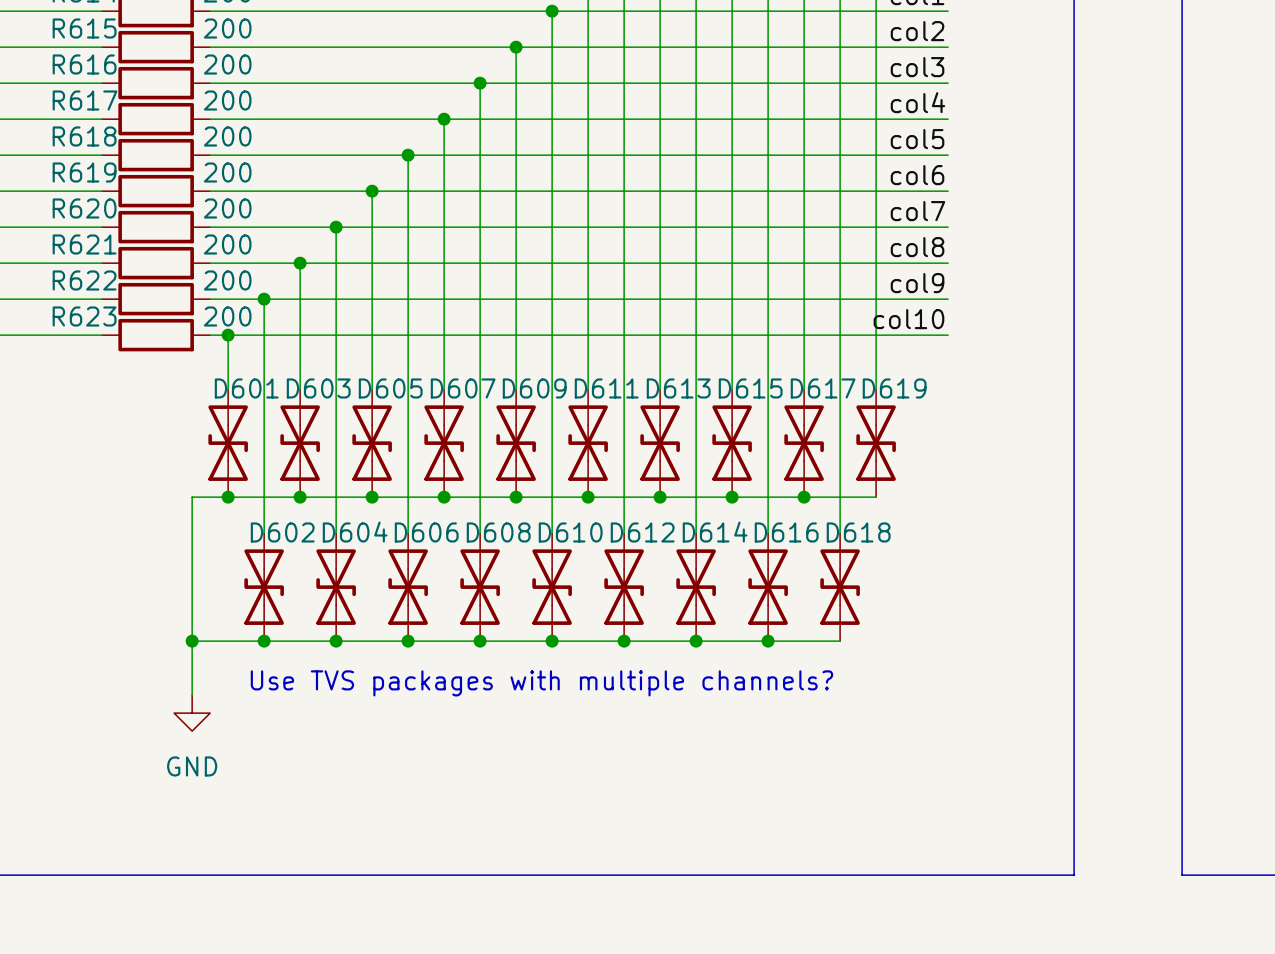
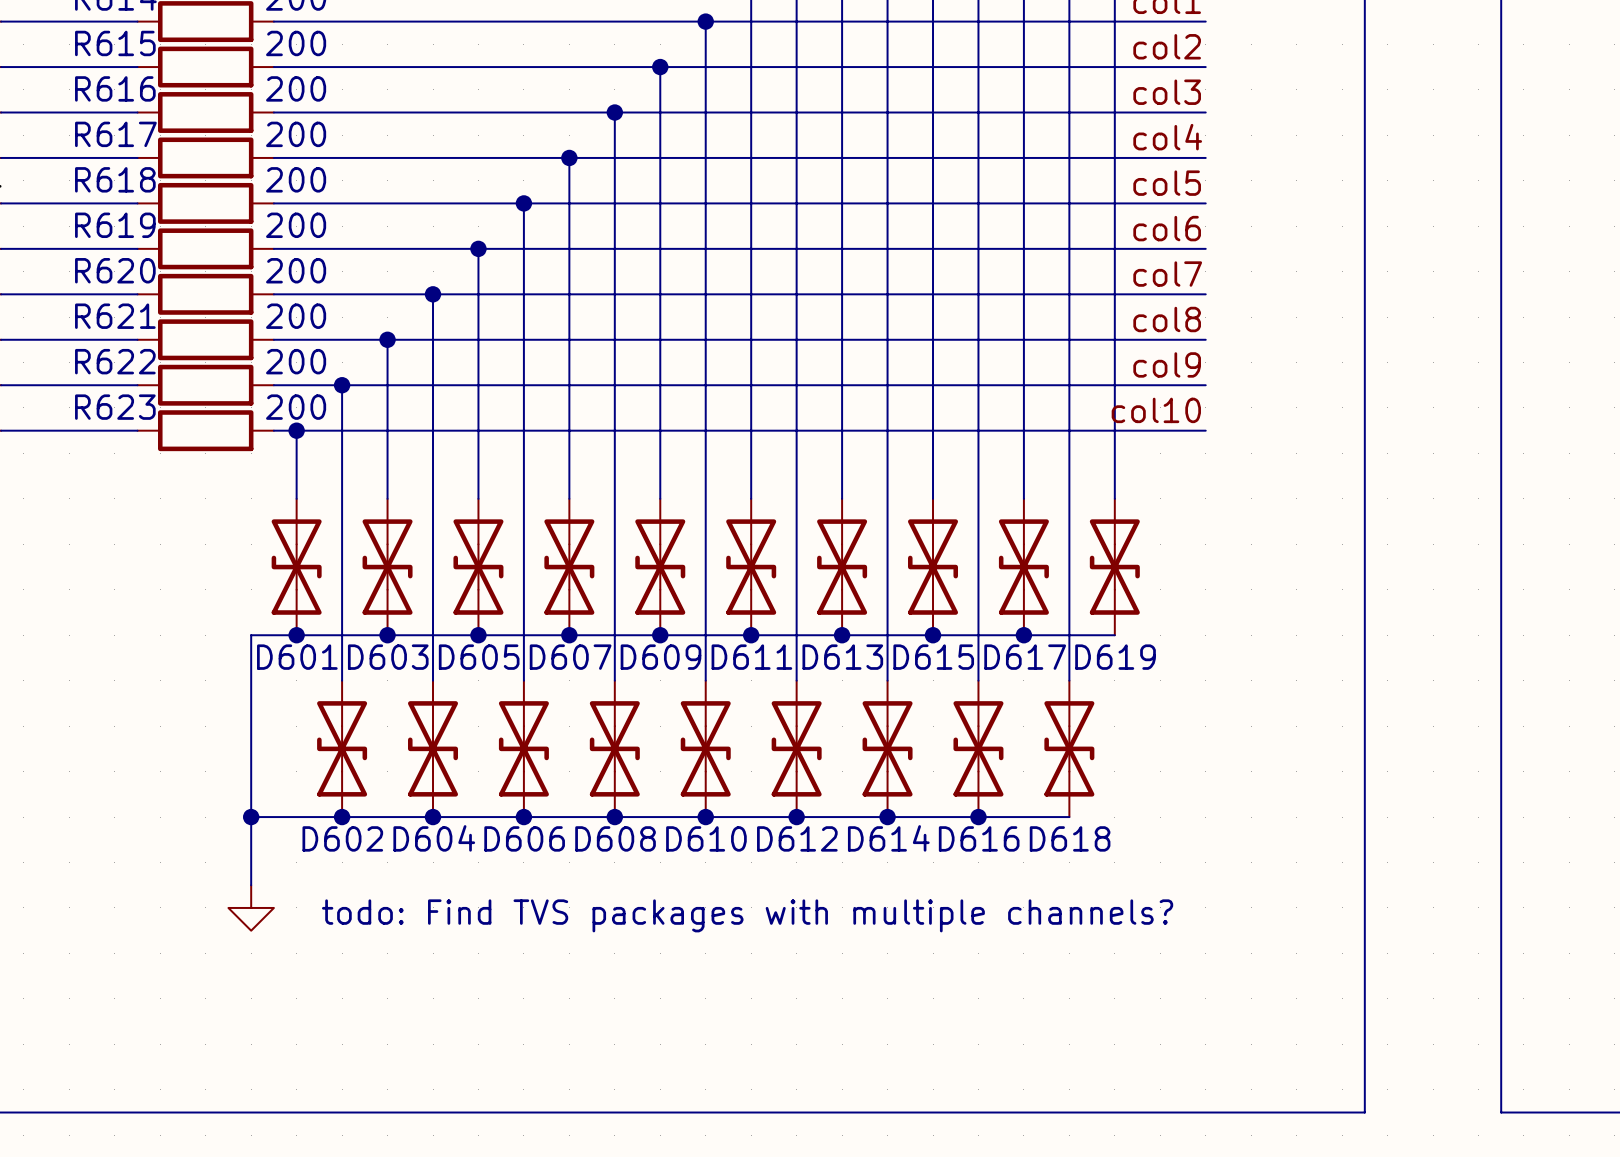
D601 name position: D601 (246, 388) -> D601 (297, 657)
D603 name position: D603 (318, 388) -> D603 (388, 657)
D605 name position: D605 (390, 388) -> D605 (479, 657)
D607 name position: D607 (463, 388) -> D607 (570, 657)
D609 name position: D609 (534, 388) -> D609 (660, 657)
D611 name position: D611 (606, 388) -> D611 (751, 657)
D613 name position: D613 (678, 388) -> D613 (842, 657)
D615 name position: D615 (750, 388) -> D615 (933, 657)
D617 name position: D617 (823, 388) -> D617 (1025, 657)
D619 name position: D619 (894, 388) -> D619 (1115, 657)
D602 name position: D602 (282, 532) -> D602 (342, 838)
D604 name position: D604 (355, 532) -> D604 (434, 838)
D606 name position: D606 (426, 532) -> D606 (524, 838)
D608 name position: D608 (498, 532) -> D608 (615, 838)
D610 name position: D610 (570, 532) -> D610 (706, 838)
D612 name position: D612 (642, 532) -> D612 (797, 838)
D614 name position: D614 (715, 532) -> D614 (888, 838)
D616 name position: D616 (786, 532) -> D616 (979, 838)
D618 name position: D618 (858, 532) -> D618 (1070, 838)
text: Use TVS packages with multiple channels? (541, 683) -> todo: Find TVS packages with multiple channels? (747, 915)
power symbol text: GND (192, 766) -> none

